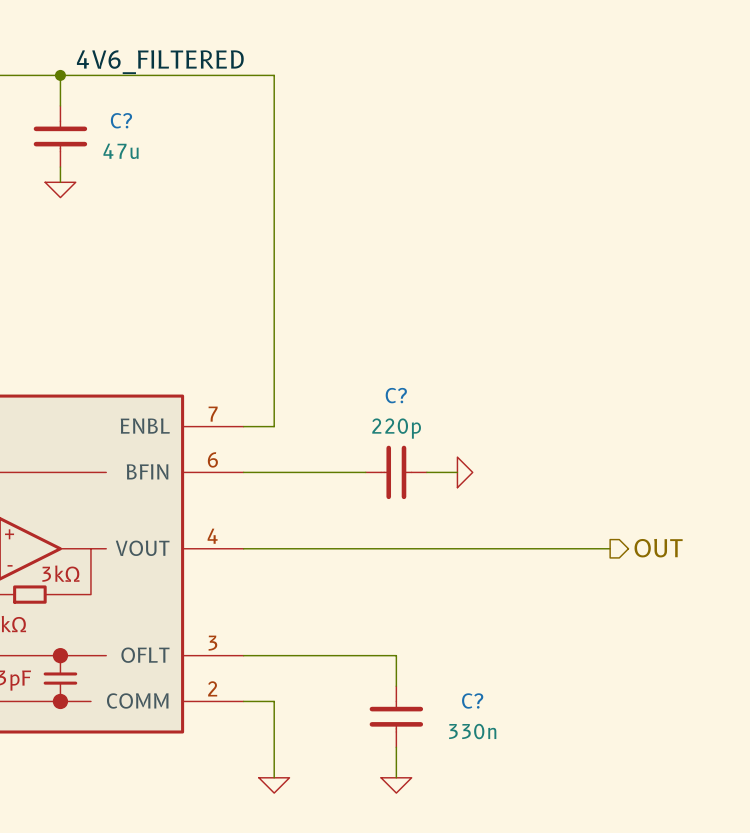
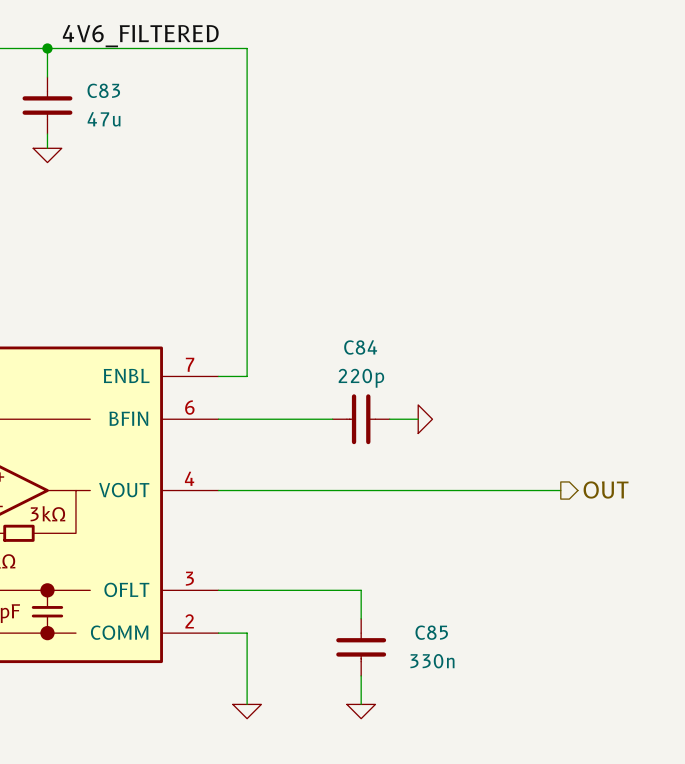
C? name: C? (121, 120) -> C83 (103, 90)
C? name: C? (396, 395) -> C84 (360, 347)
C? name: C? (472, 700) -> C85 (431, 632)

